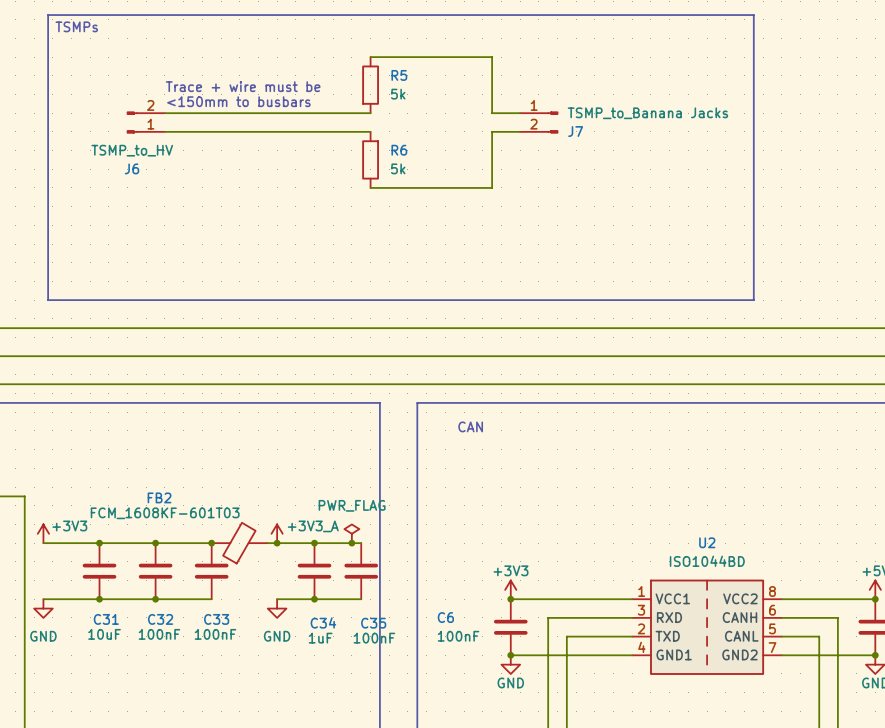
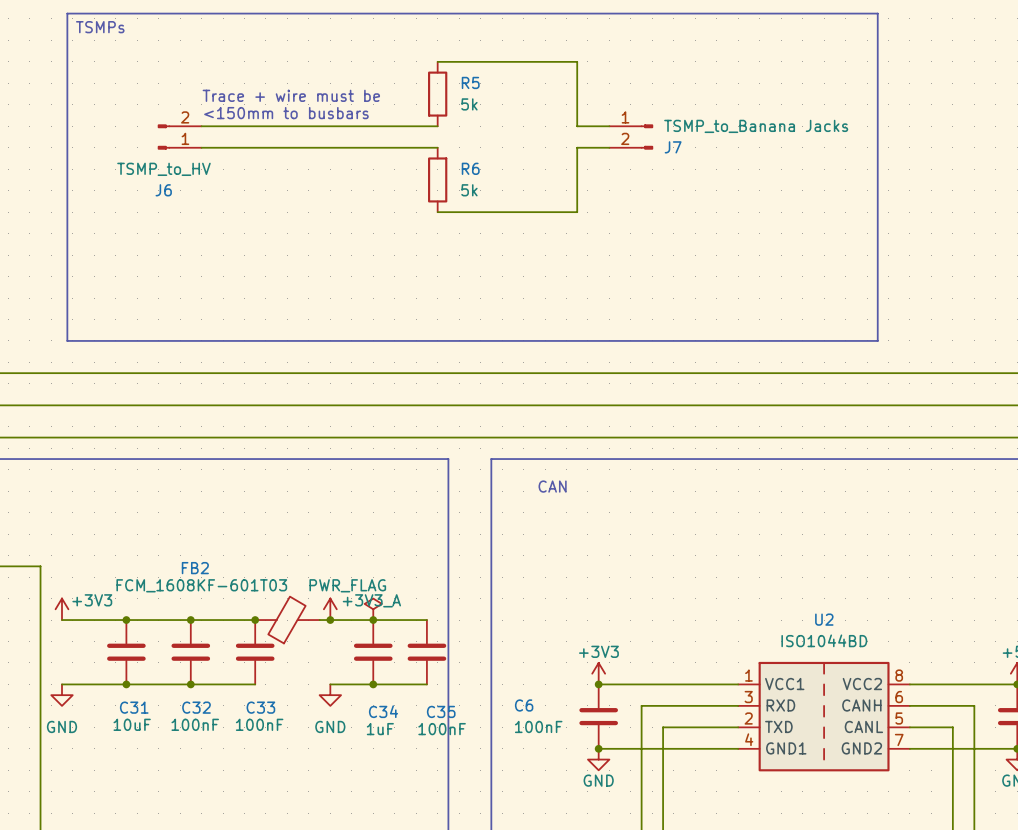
power symbol text position: PWR_FLAG (352, 505) -> PWR_FLAG (347, 585)
power symbol position: PWR_FLAG (351, 533) -> PWR_FLAG (373, 609)
junction: (351, 543) -> none

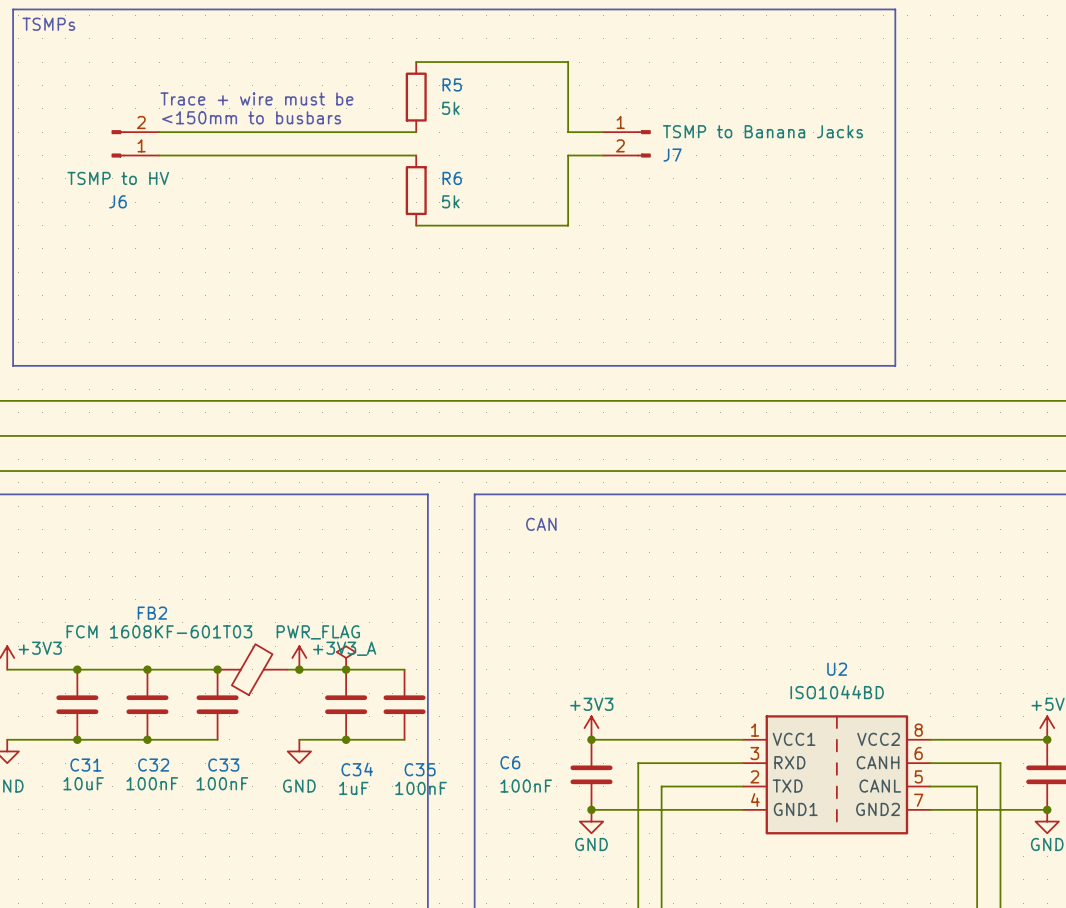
J7 value: TSMP_to_Banana Jacks (756, 126) -> TSMP to Banana Jacks (762, 131)
J6 value: TSMP_to_HV (163, 169) -> TSMP to HV (118, 178)
FB2 value: FCM_1608KF-601T03 (201, 585) -> FCM 1608KF-601T03 (159, 631)

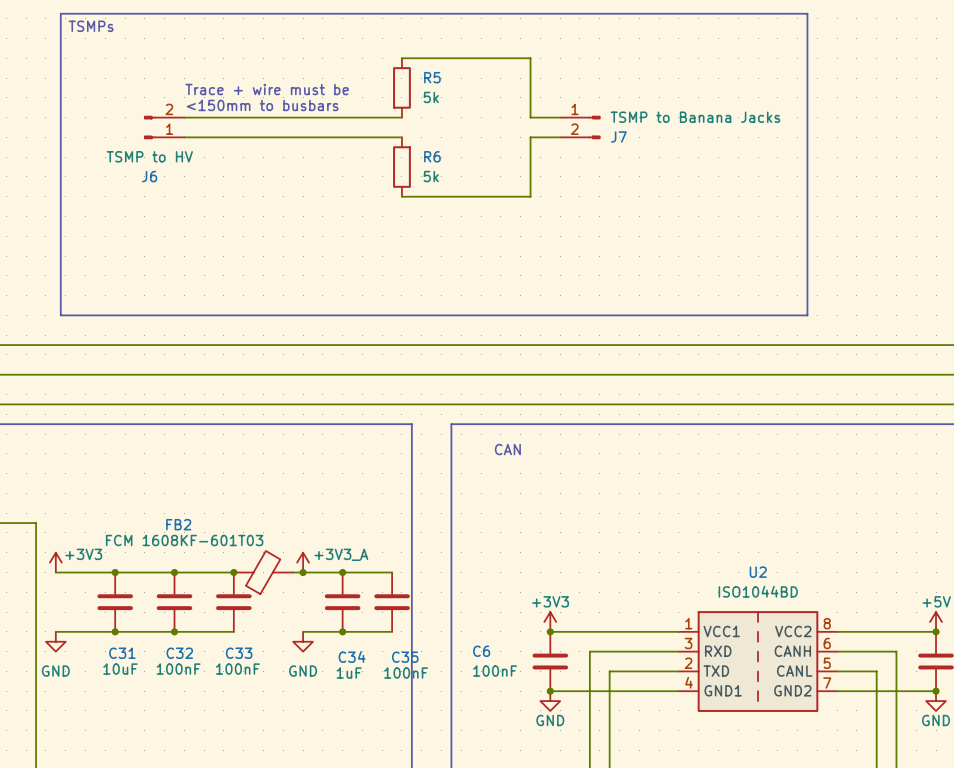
power symbol: PWR_FLAG (346, 657) -> none

